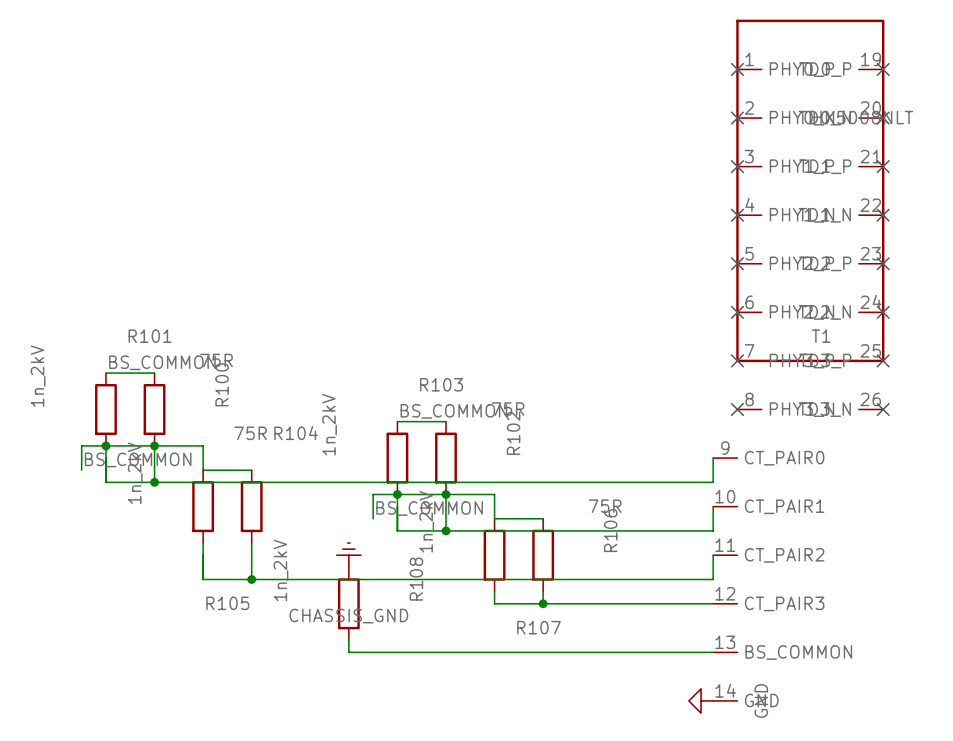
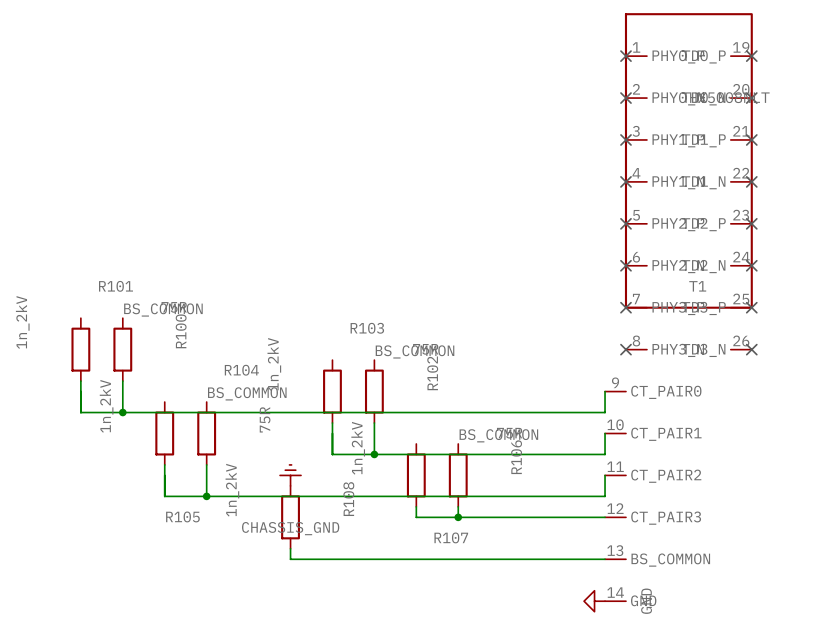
label position: BS_COMMON (162, 362) -> BS_COMMON (163, 310)
wire: (105, 373) (154, 373) -> none
label position: BS_COMMON (453, 411) -> BS_COMMON (415, 351)
wire: (397, 421) (446, 421) -> none
R104 value rotation: 0° (250, 433) -> 90° counterclockwise (265, 419)
R104 value position: 75R (250, 433) -> 75R (265, 419)
junction: (105, 445) -> none
junction: (154, 445) -> none
label: BS_COMMON (138, 459) -> none
label: none -> BS_COMMON (247, 393)
wire: (81, 470) (81, 445) (203, 445) (203, 470) (251, 470) -> none
junction: (397, 494) -> none
junction: (446, 494) -> none
label: BS_COMMON (429, 508) -> none
label: none -> BS_COMMON (498, 435)
wire: (373, 518) (373, 494) (494, 494) (494, 518) (543, 518) -> none

